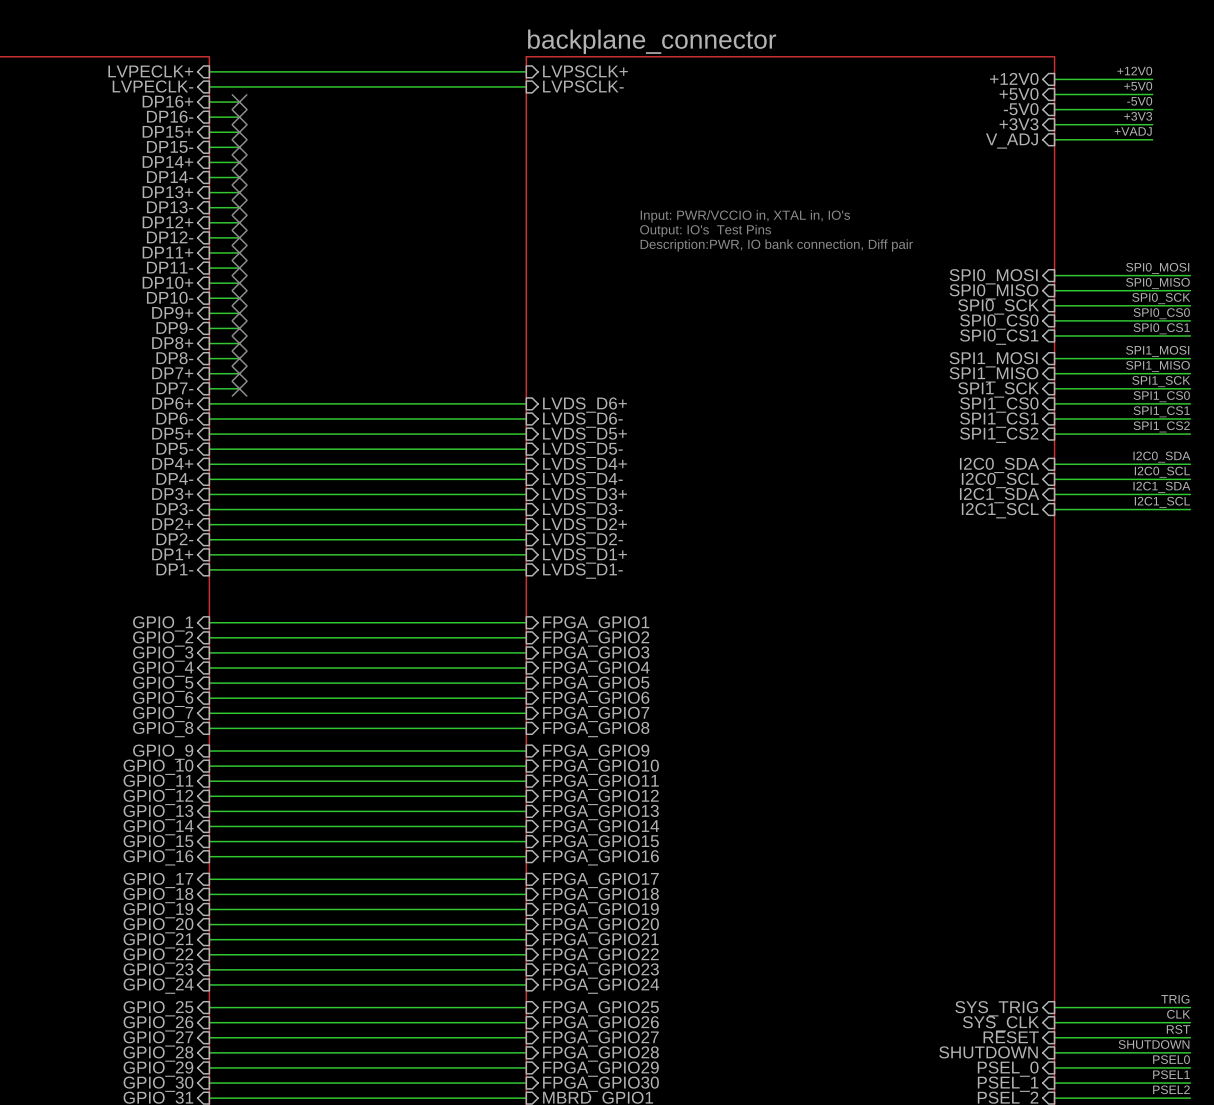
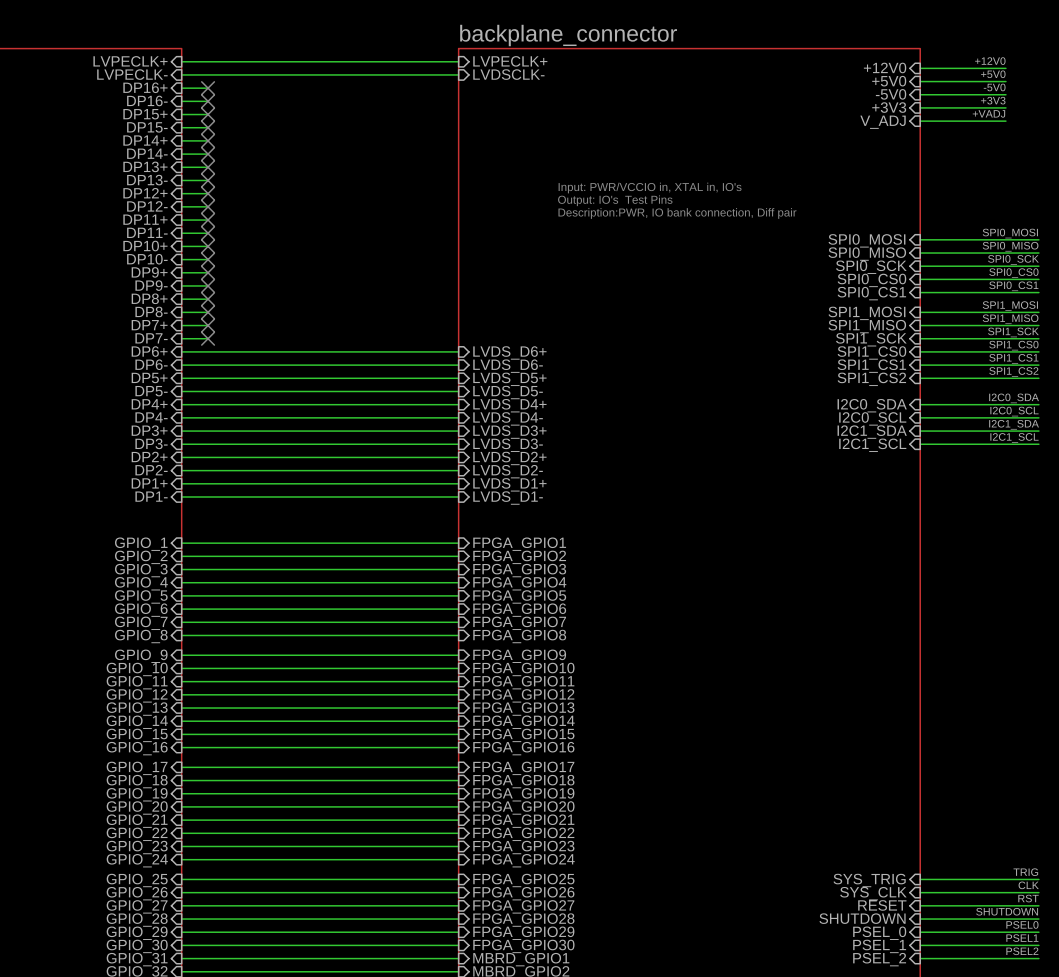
sheet pin: LVPSCLK+ (585, 71) -> LVPECLK+ (510, 61)
sheet pin: LVPSCLK- (583, 86) -> LVDSCLK- (508, 74)

